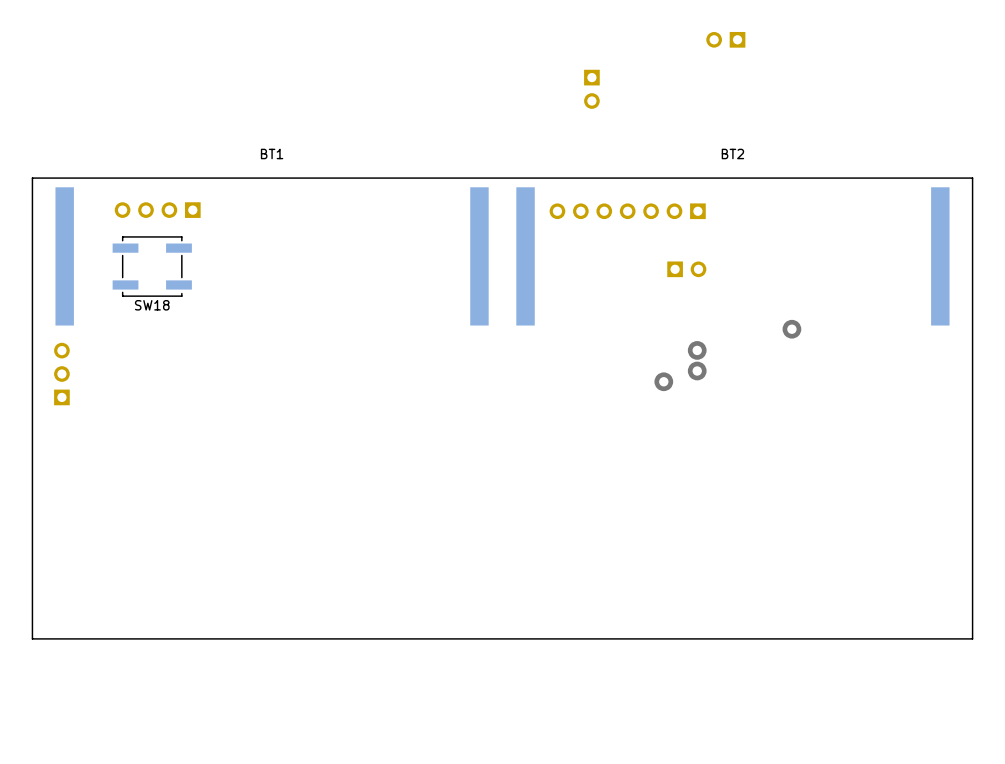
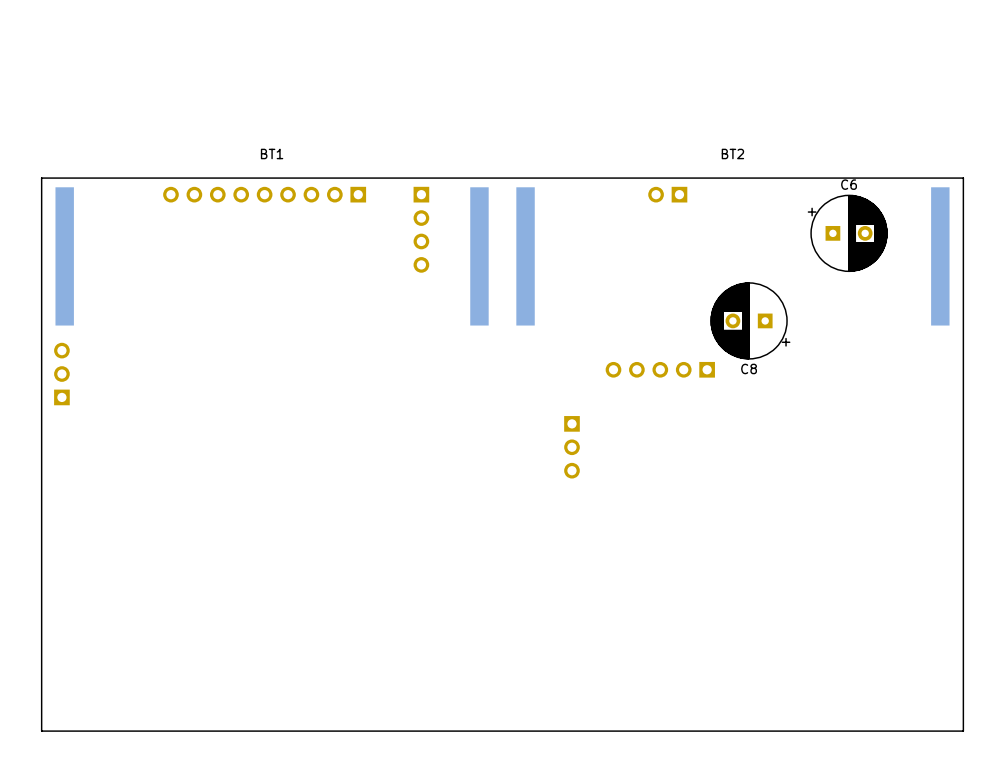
part: (725, 39) -> none
part: (591, 89) -> none
board edge: (963, 178) (972, 178) (972, 638) (32, 638) (32, 178) (41, 178) -> (963, 178) (963, 731) (41, 731) (41, 178)
part: none -> (264, 194)
part: none -> (667, 194)
part: (157, 210) -> none
part: (627, 211) -> none
part: none -> (421, 229)
C6: none -> (847, 233)
SW18: (152, 266) -> none
part: (686, 269) -> none
C8: none -> (750, 320)
via: (791, 329) -> none
via: (697, 350) -> none
part: none -> (660, 369)
via: (697, 370) -> none
via: (663, 381) -> none
part: none -> (571, 447)

